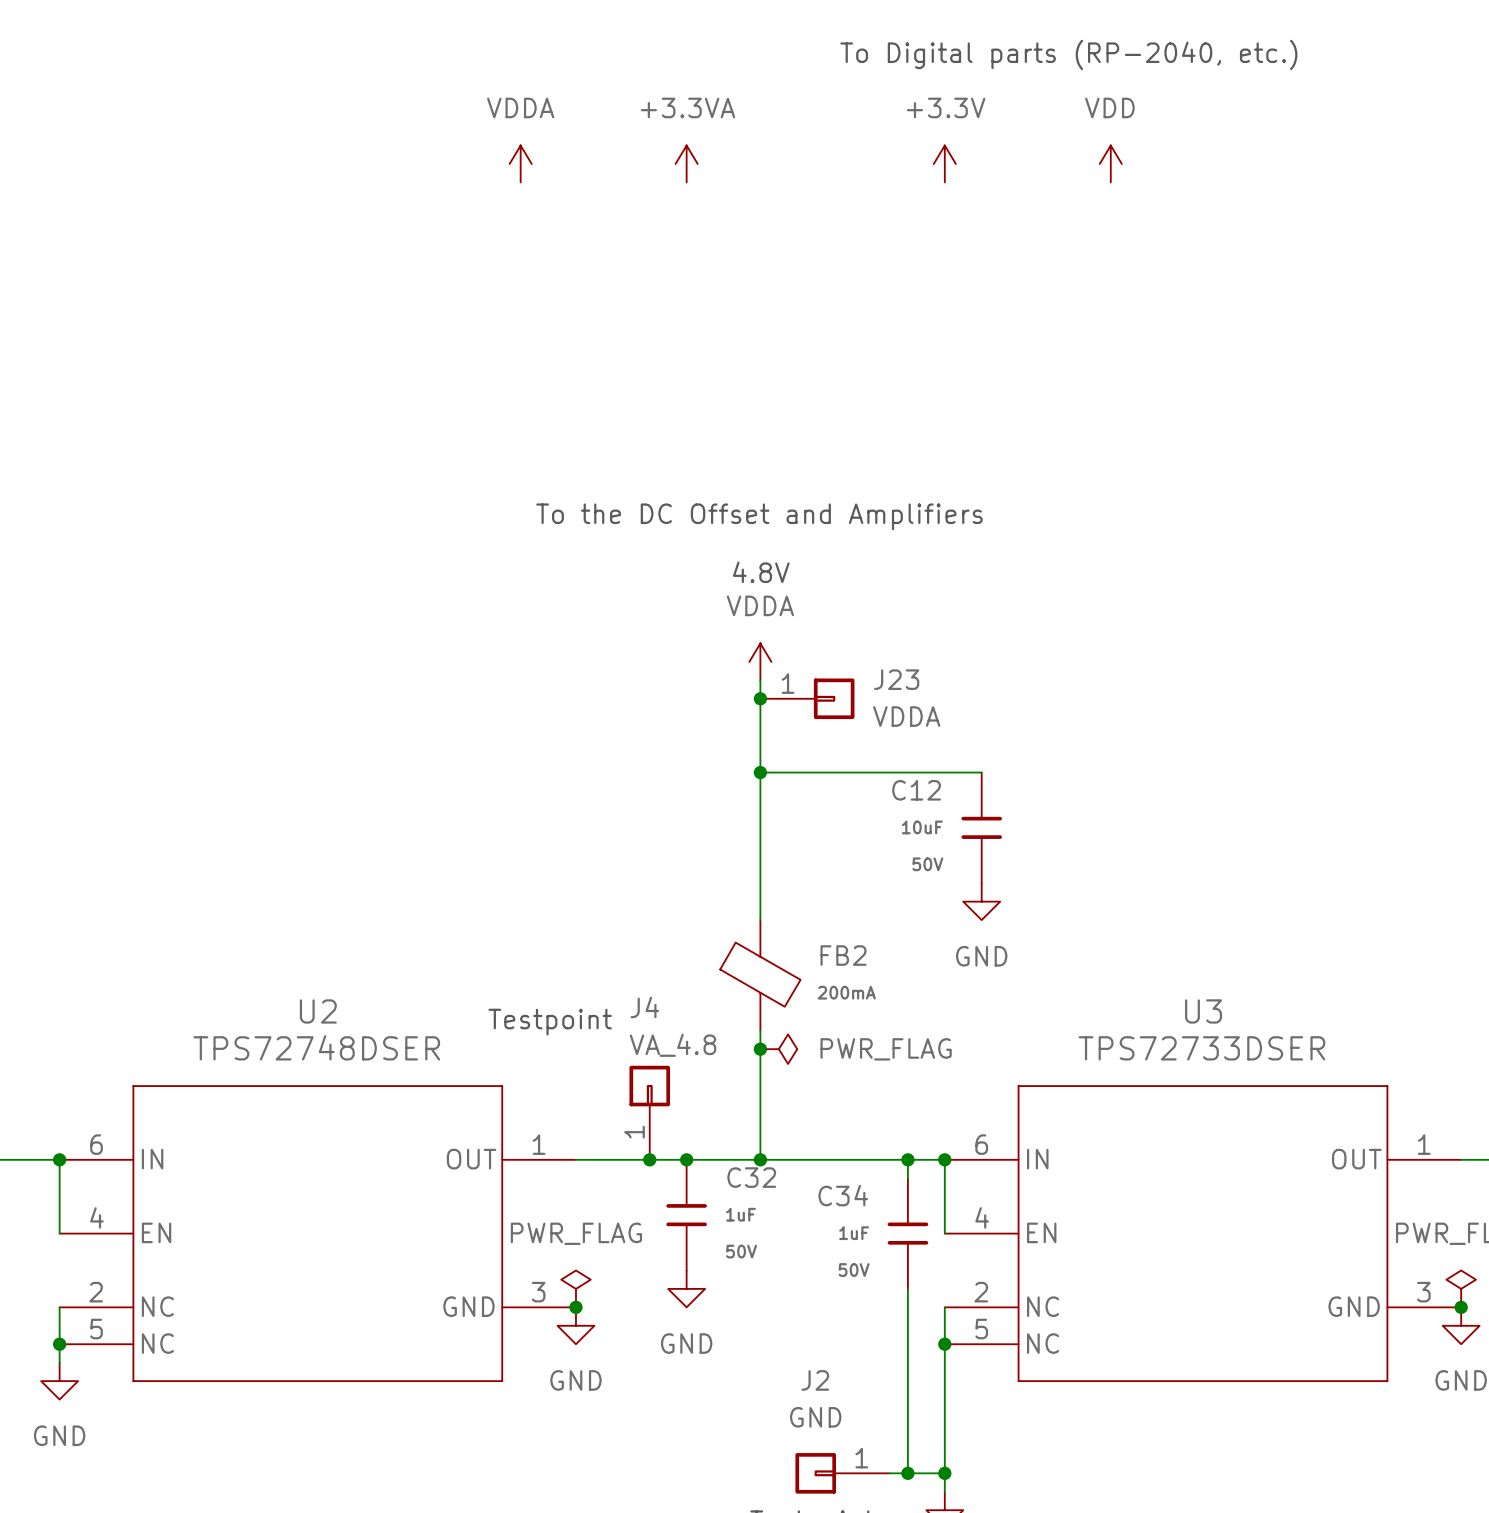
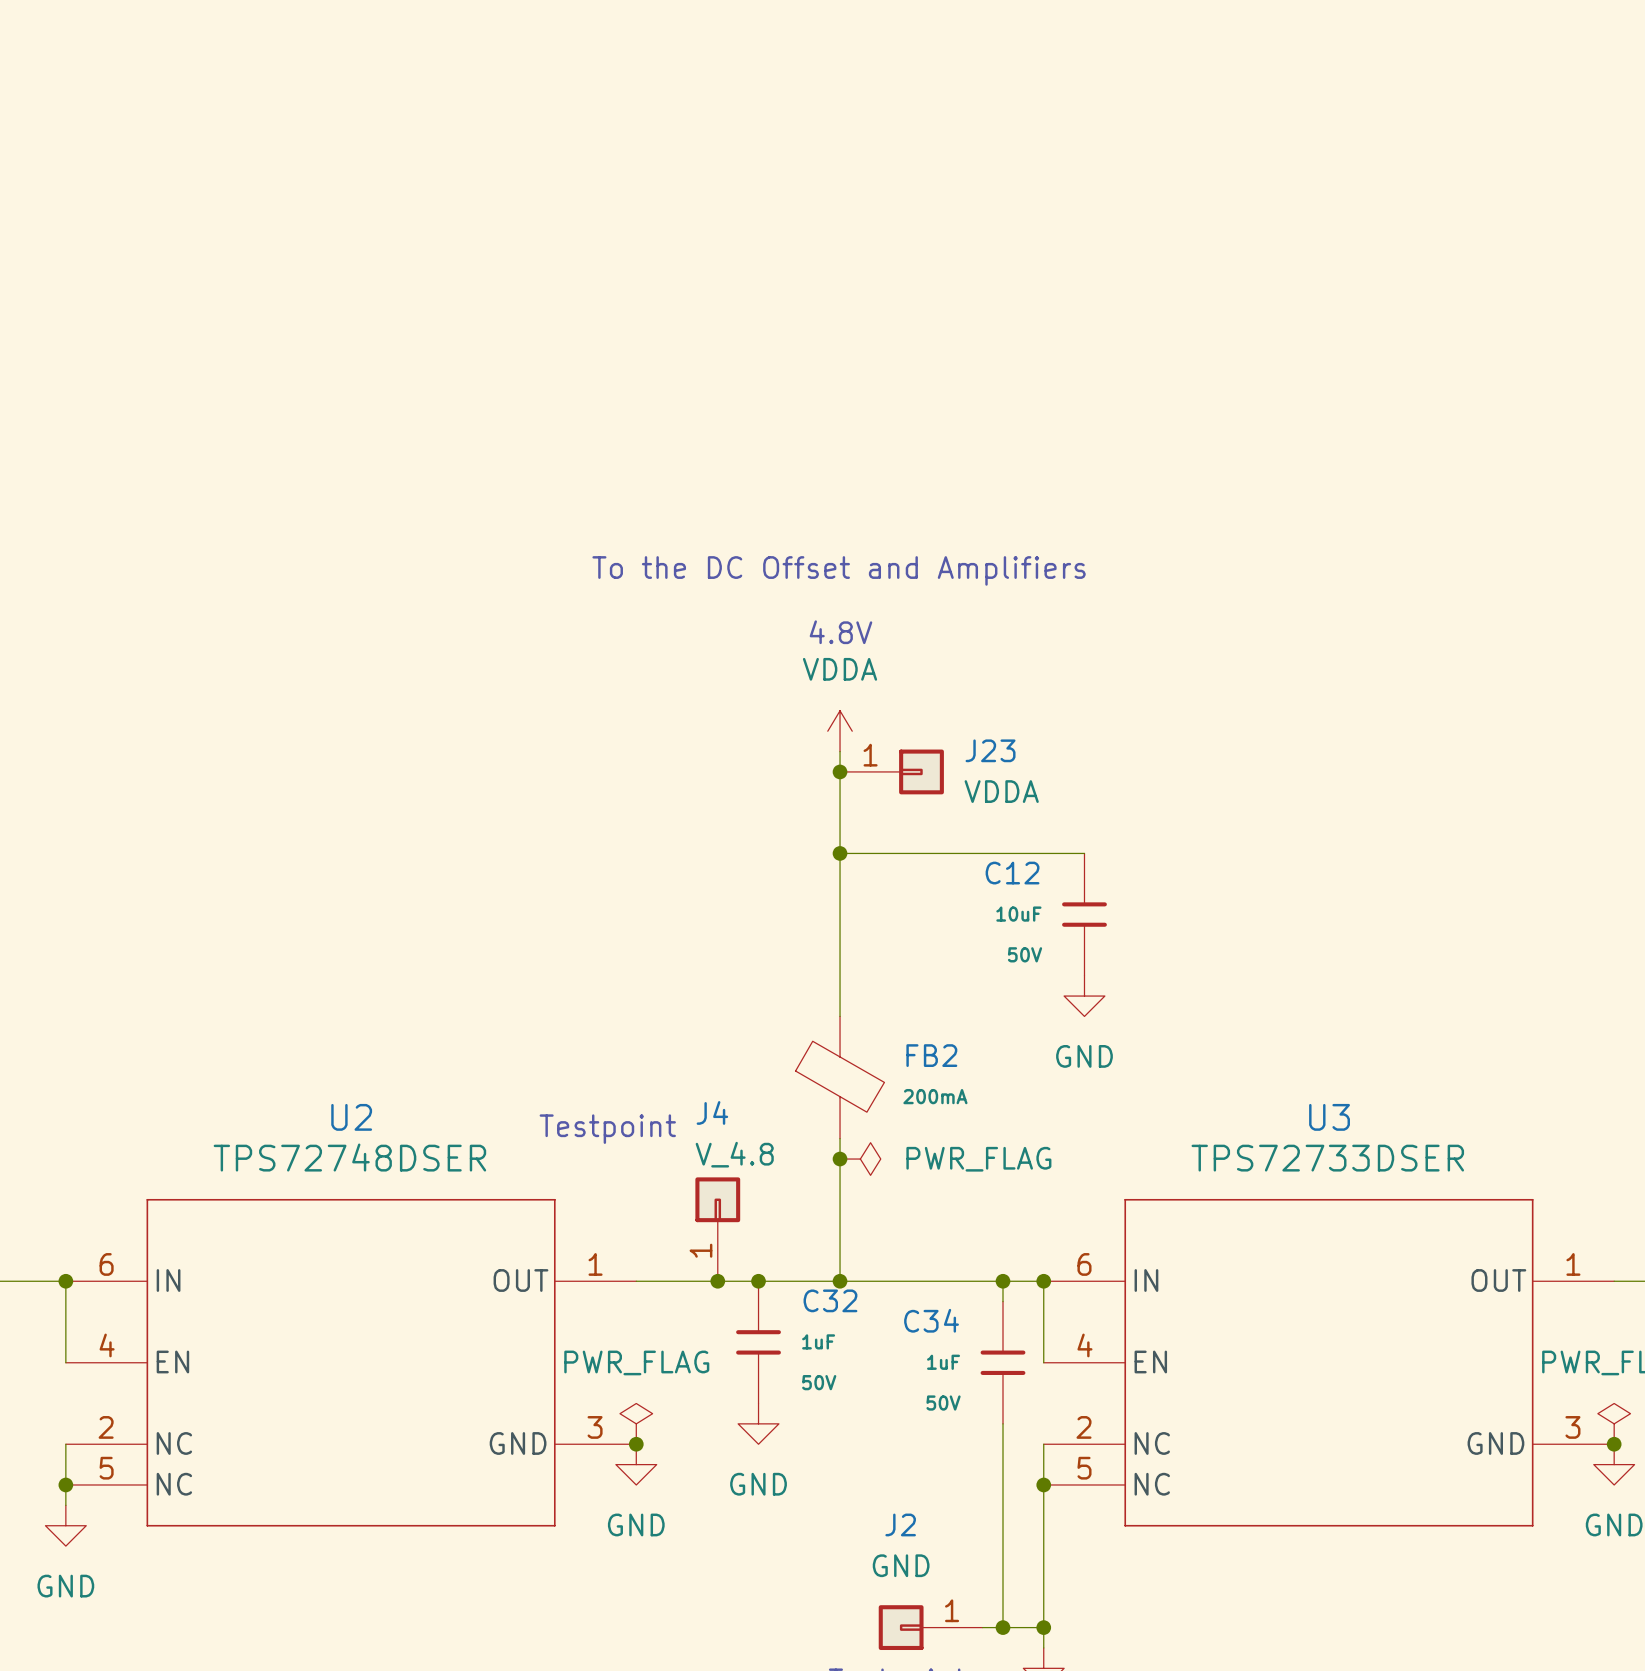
text: To Digital parts (RP-2040, etc.) (1068, 54) -> none
power symbol: VDDA (520, 163) -> none
power symbol: +3.3VA (686, 163) -> none
power symbol: +3.3V (944, 163) -> none
power symbol: VDD (1110, 163) -> none
J4 value: VA_4.8 (672, 1045) -> V_4.8 (734, 1154)

